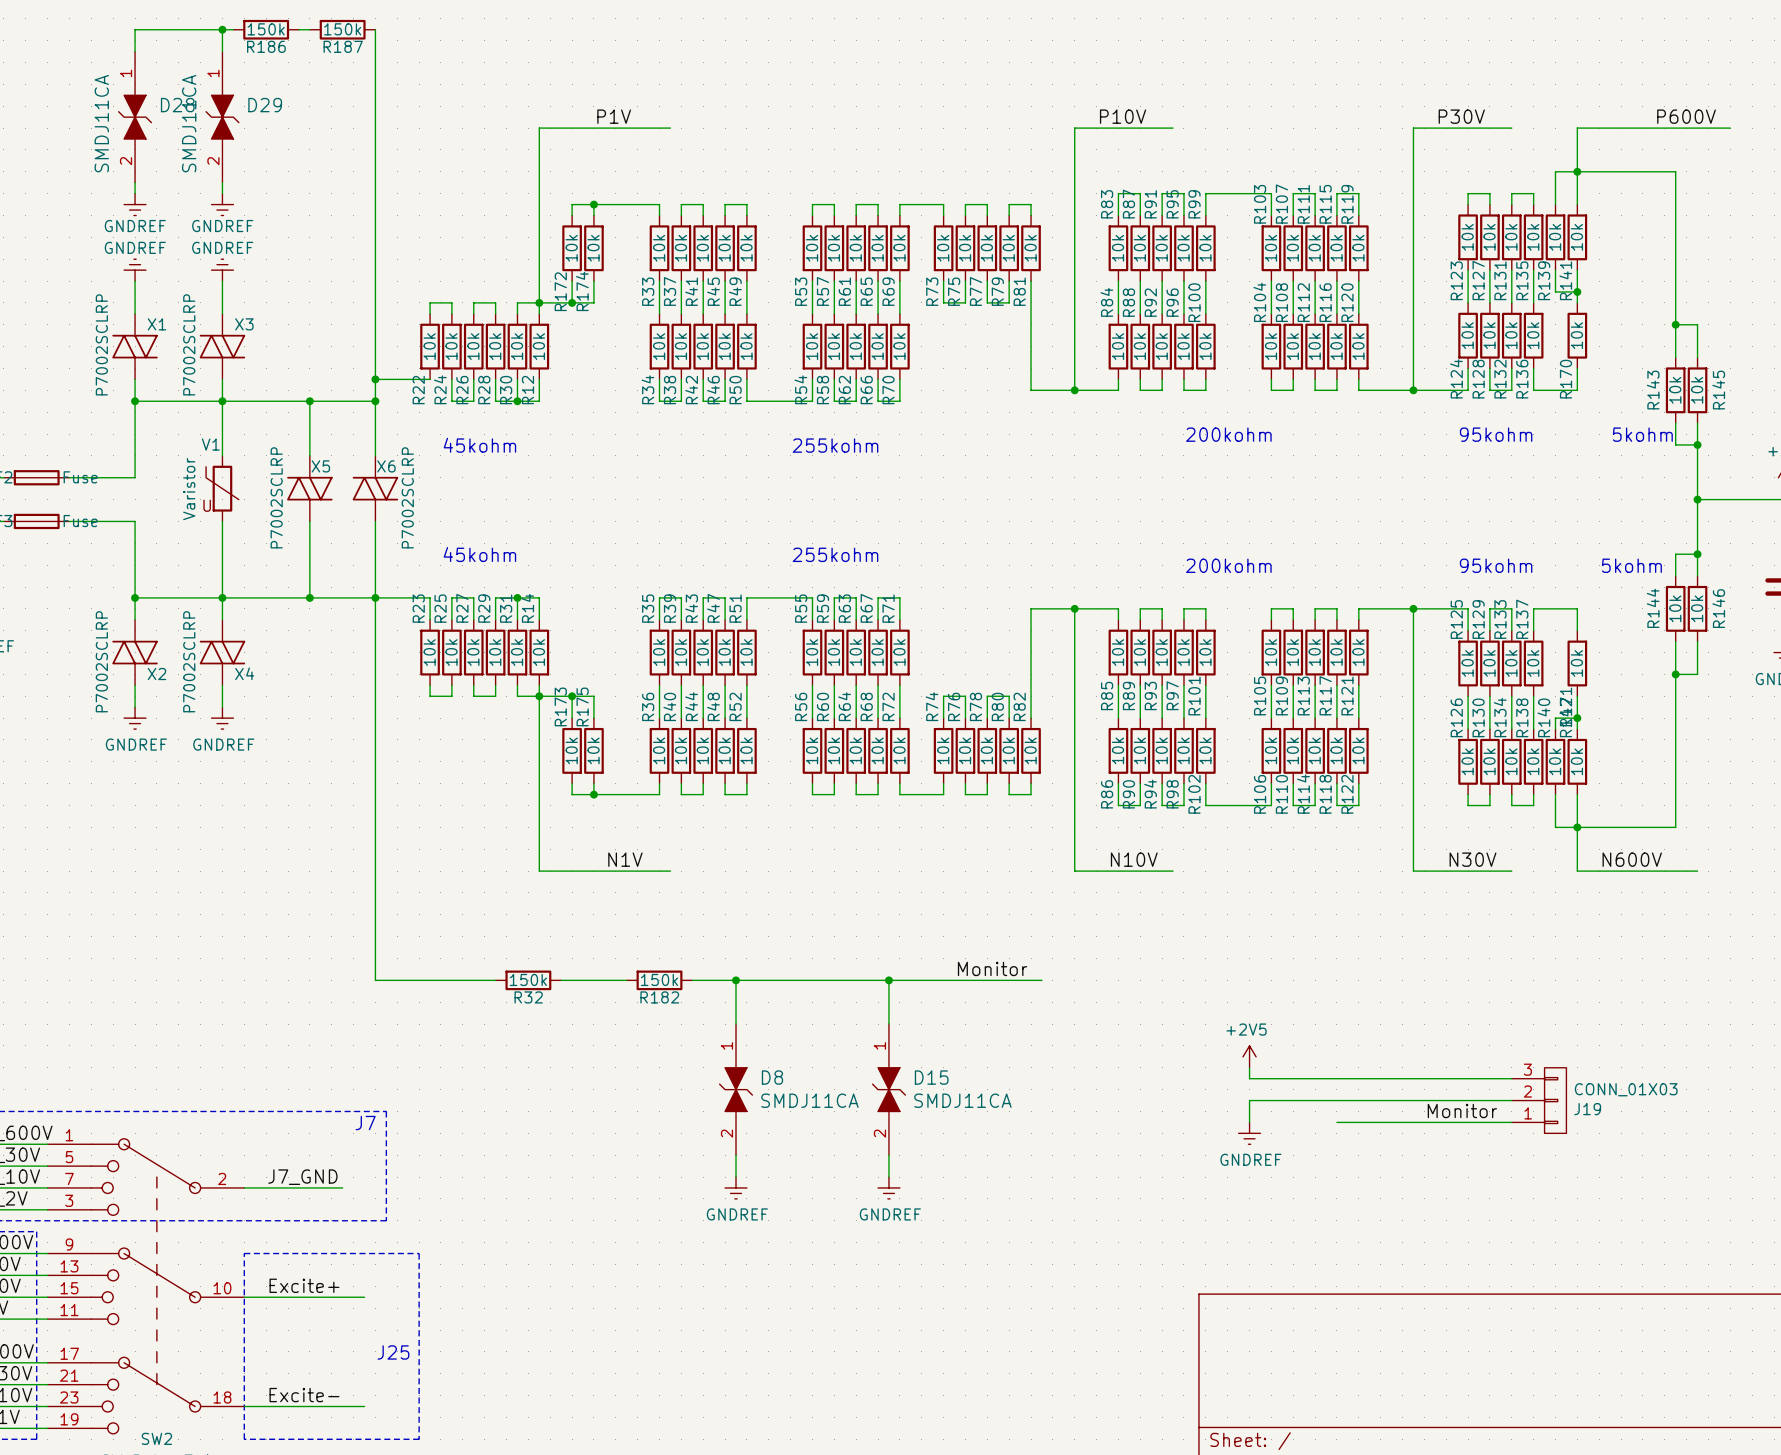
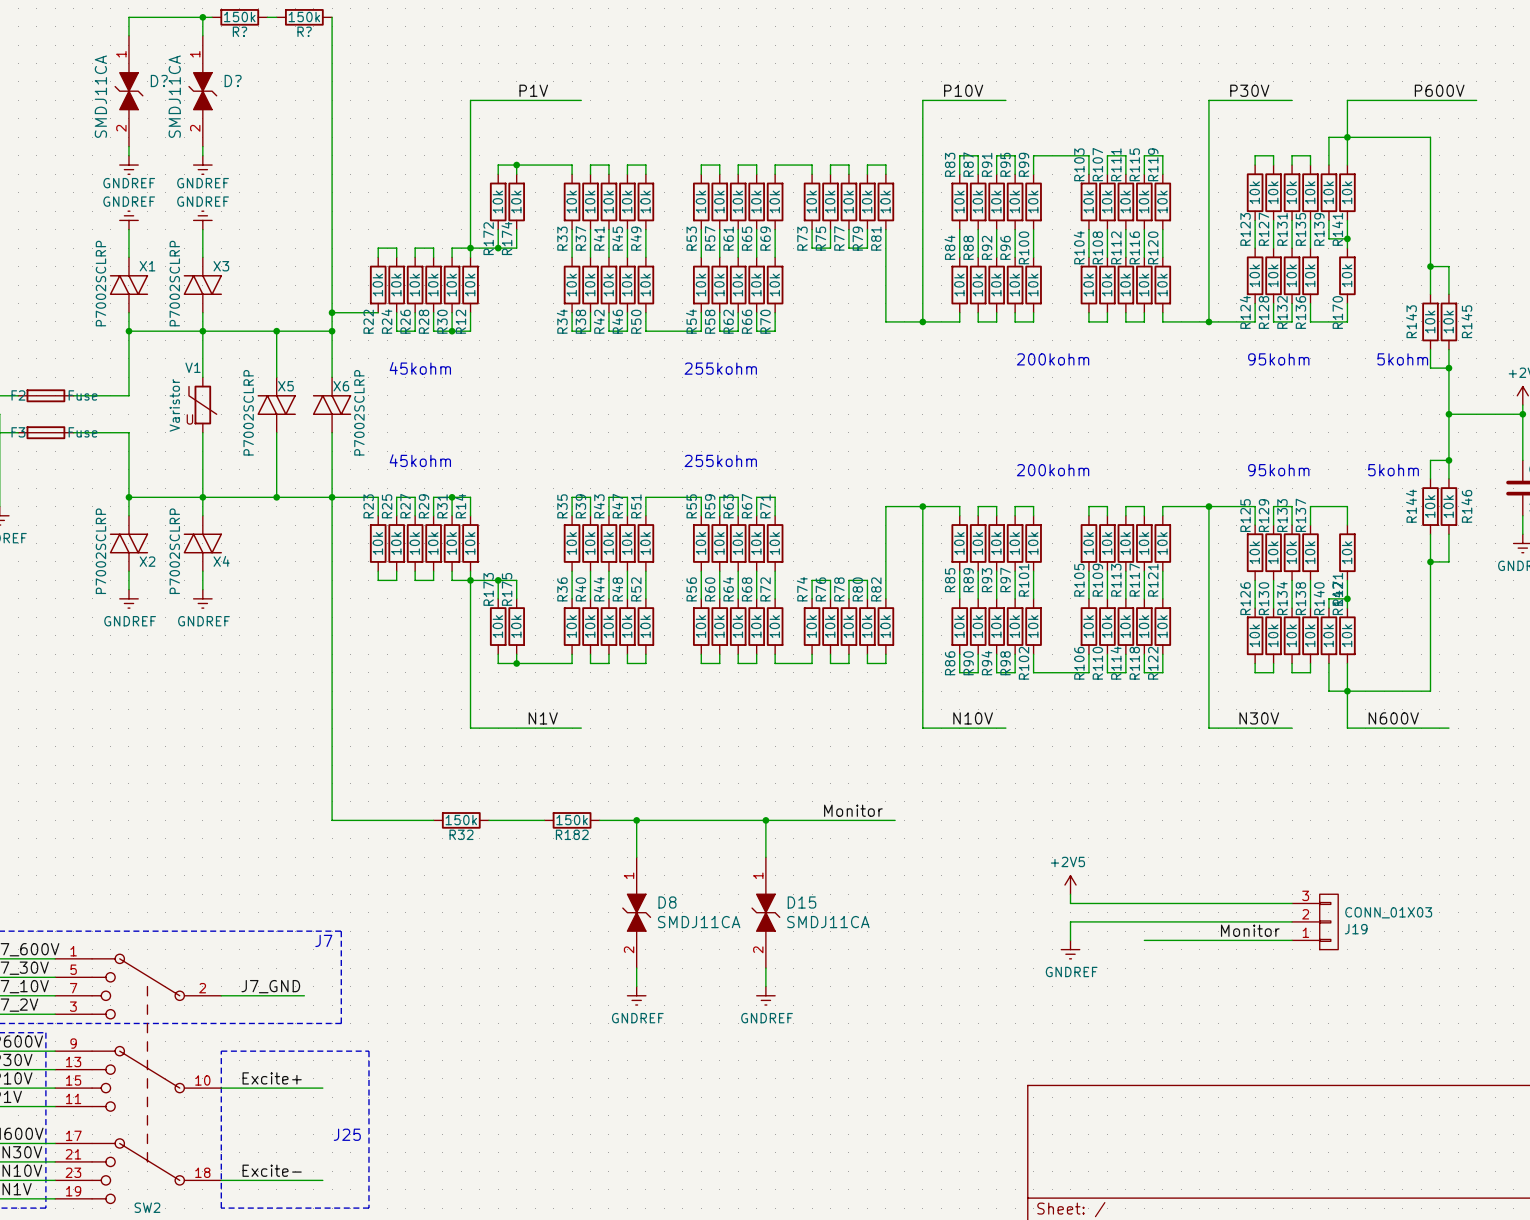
R186 name: R186 (266, 46) -> R? (239, 31)
R187 name: R187 (343, 46) -> R? (304, 31)
D28 name: D28 (177, 105) -> D? (159, 80)
D29 name: D29 (265, 105) -> D? (233, 80)

